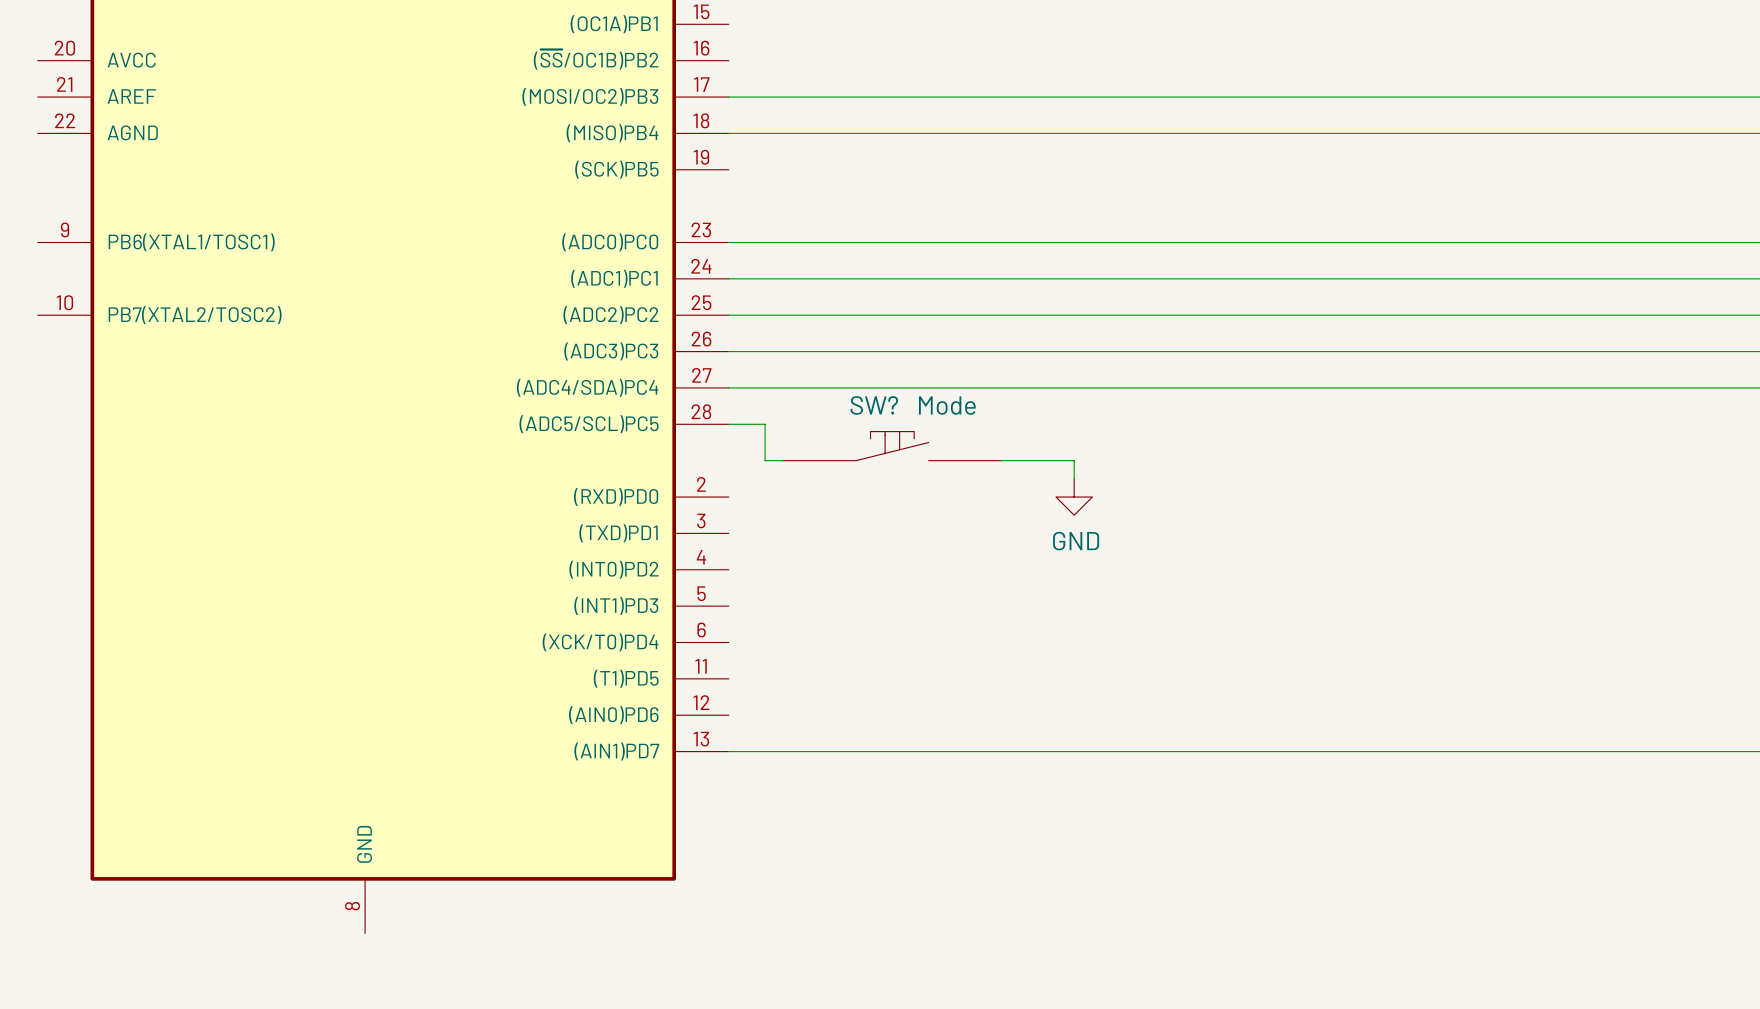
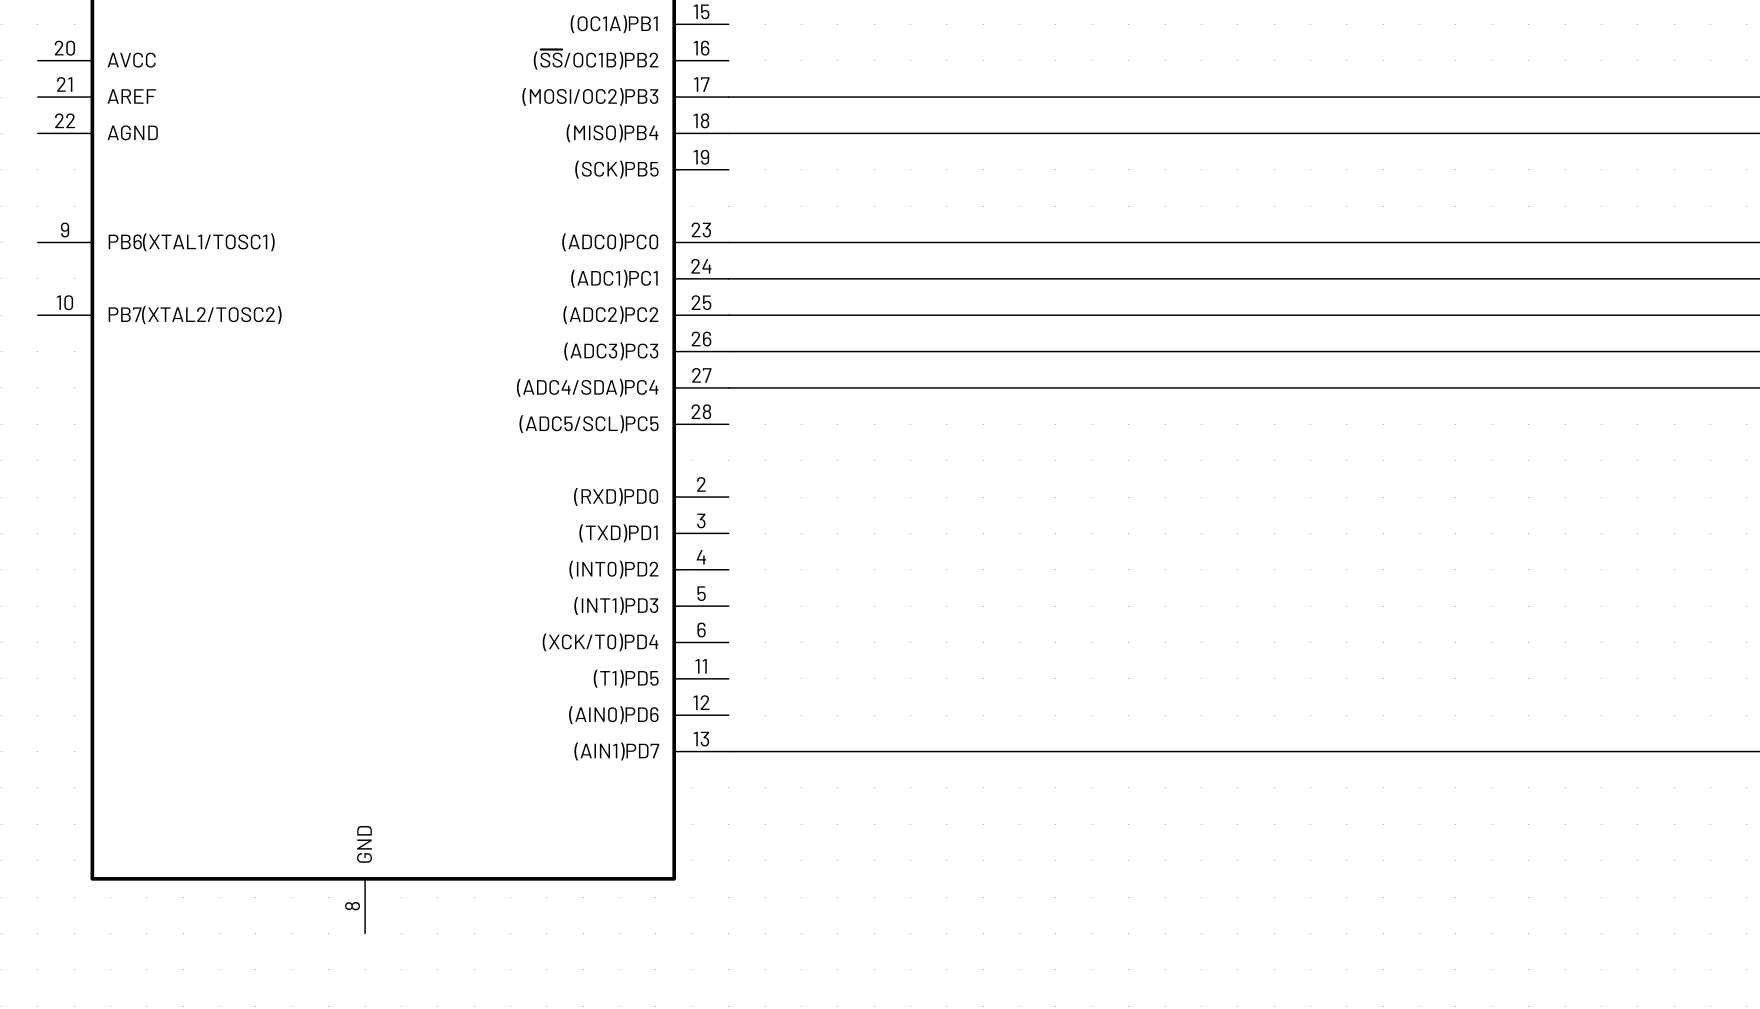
wire: (728, 424) (765, 424) (765, 460) (783, 460) -> none
SW?: Mode (892, 446) -> none
wire: (1001, 460) (1074, 460) (1074, 478) -> none
power symbol: GND (1074, 497) -> none

